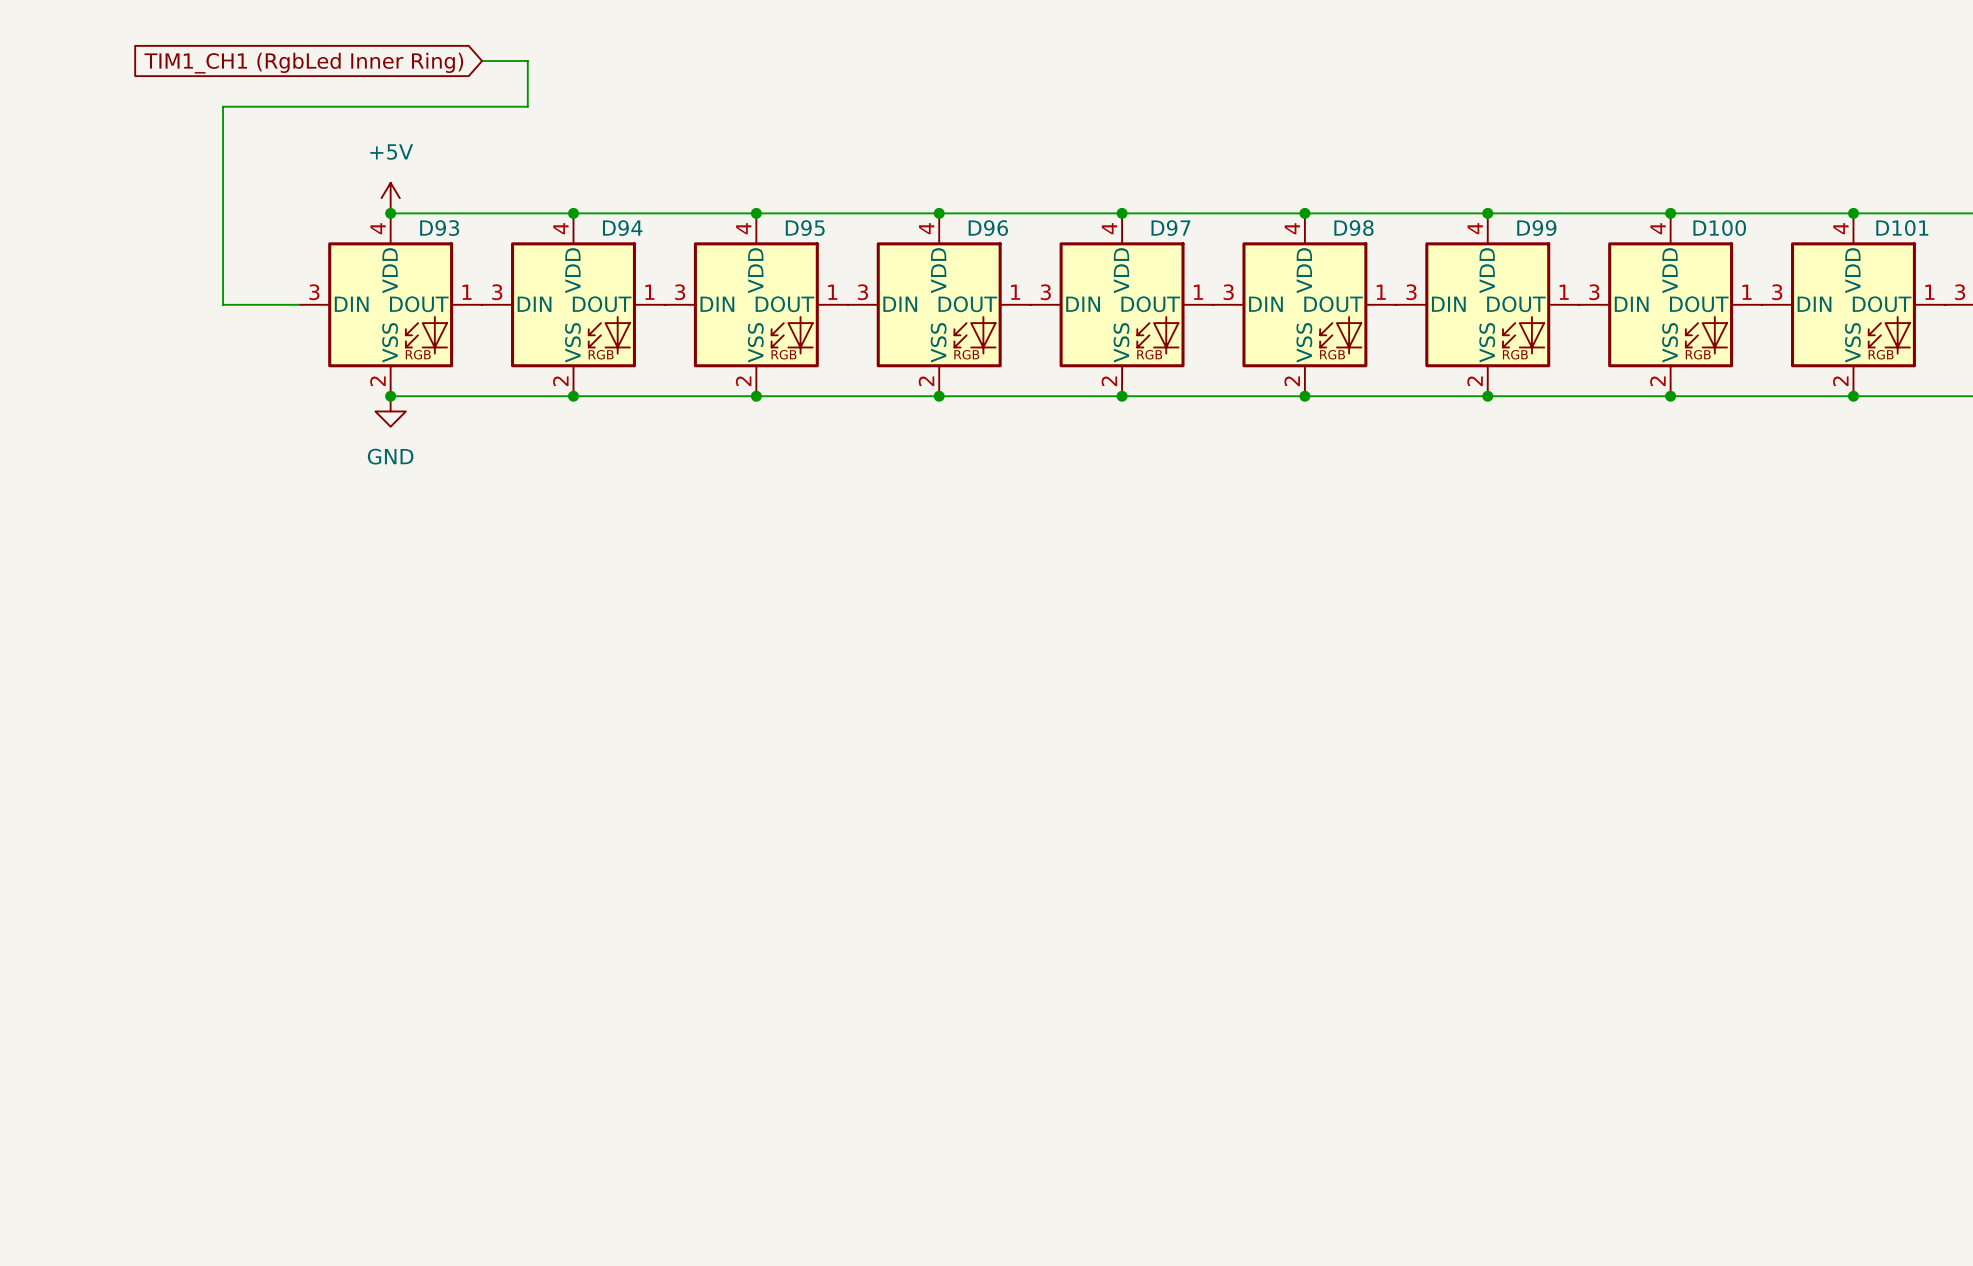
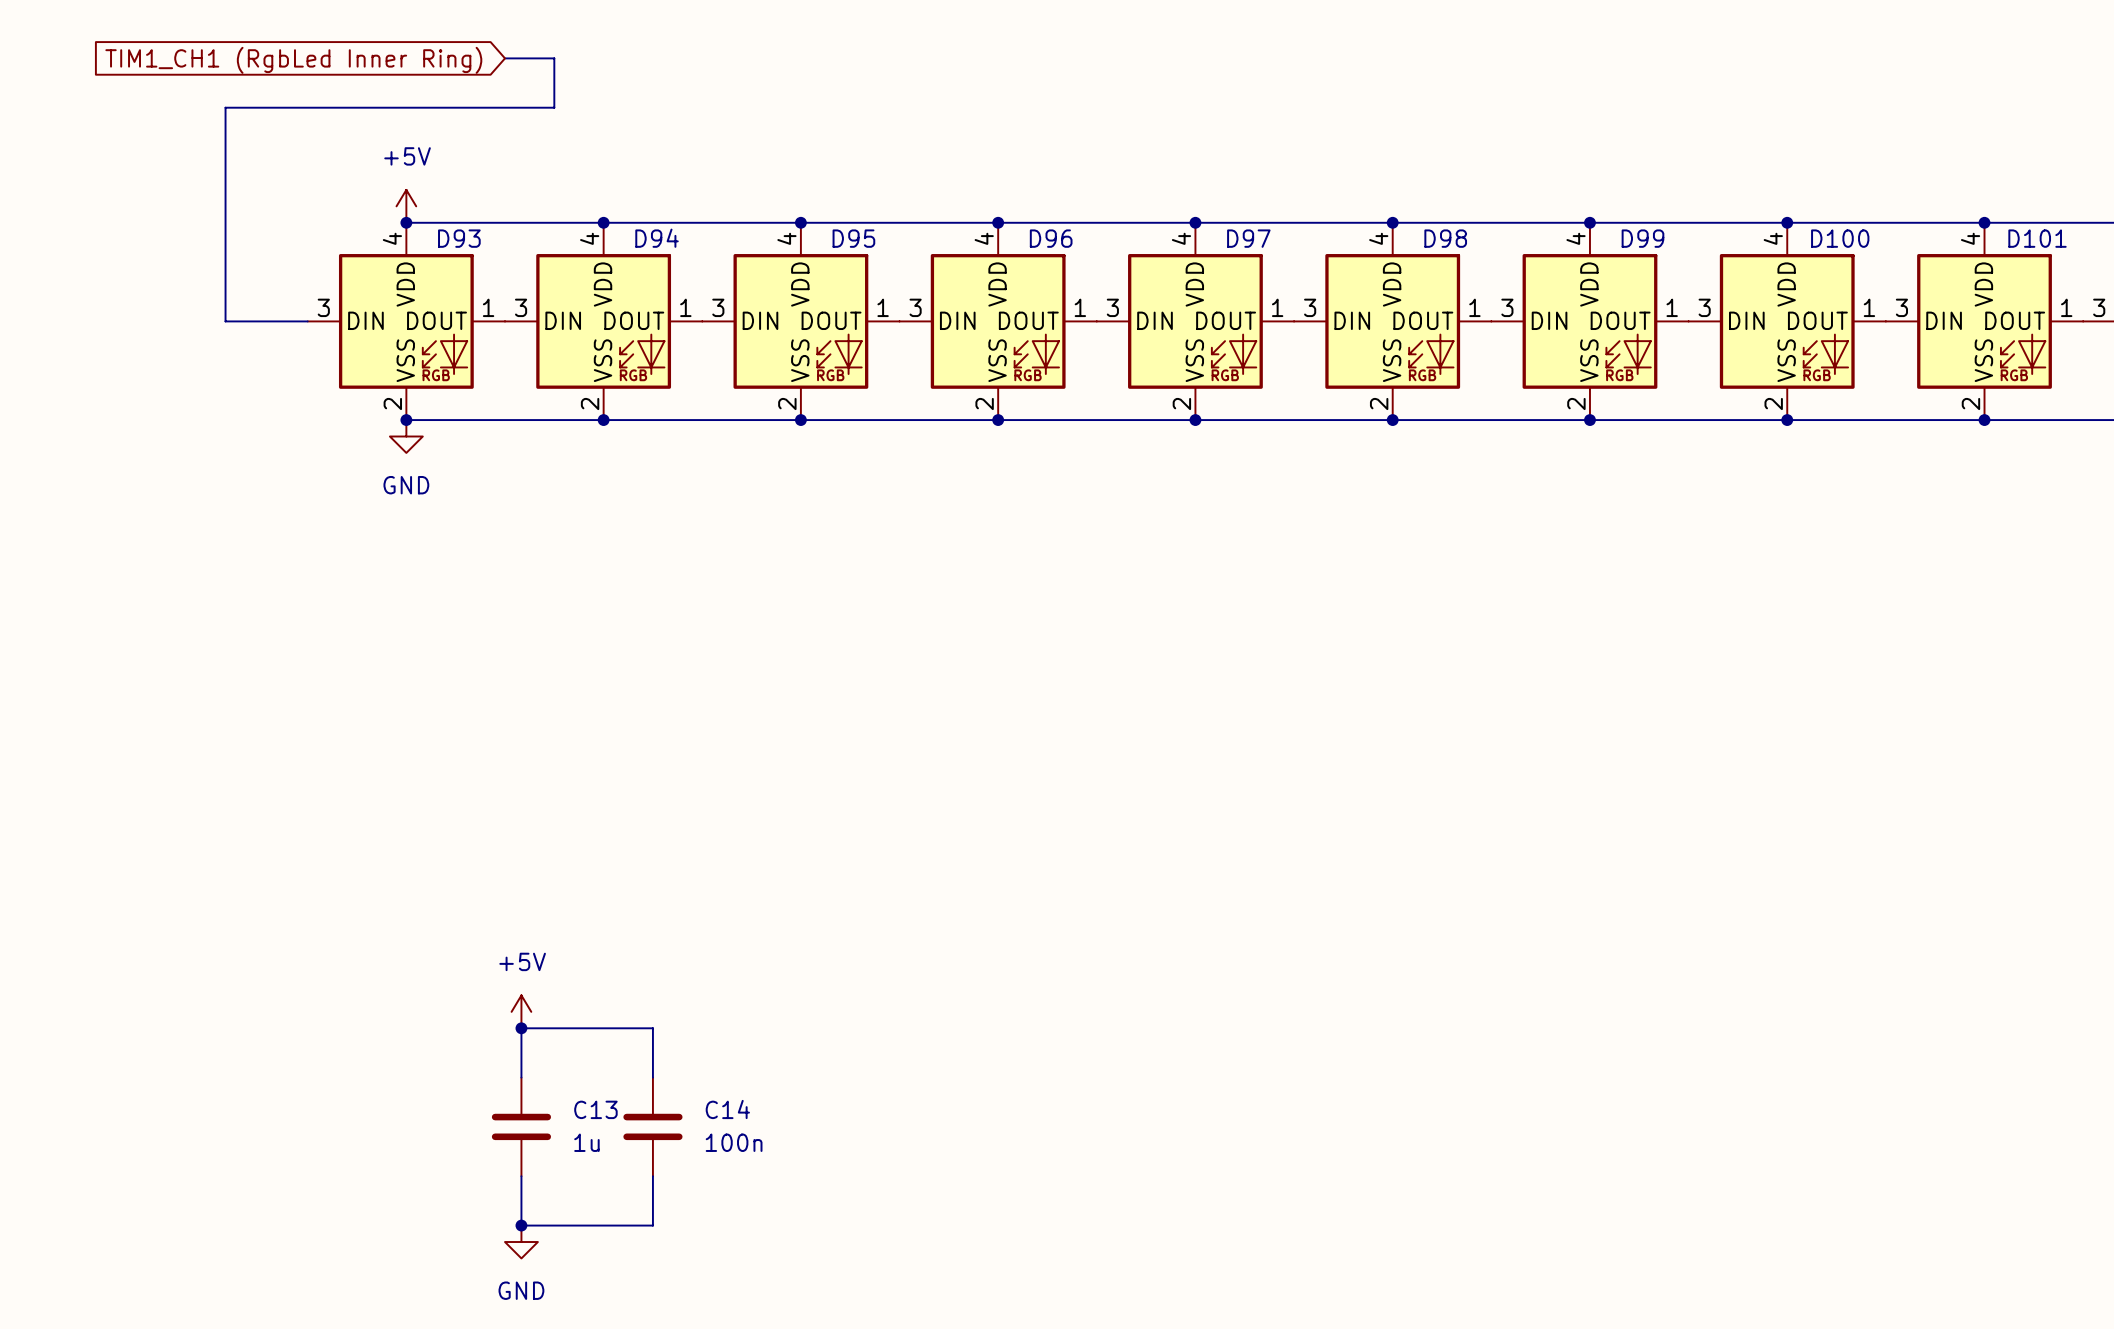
power symbol: none -> +5V (521, 1011)
junction: none -> (521, 1028)
wire: none -> (521, 1077) (521, 1028) (652, 1028) (652, 1077)
C13: none -> 1u (521, 1126)
C14: none -> 100n (652, 1126)
wire: none -> (521, 1176) (521, 1225) (652, 1225) (652, 1176)
junction: none -> (521, 1225)
power symbol: none -> GND (521, 1242)

